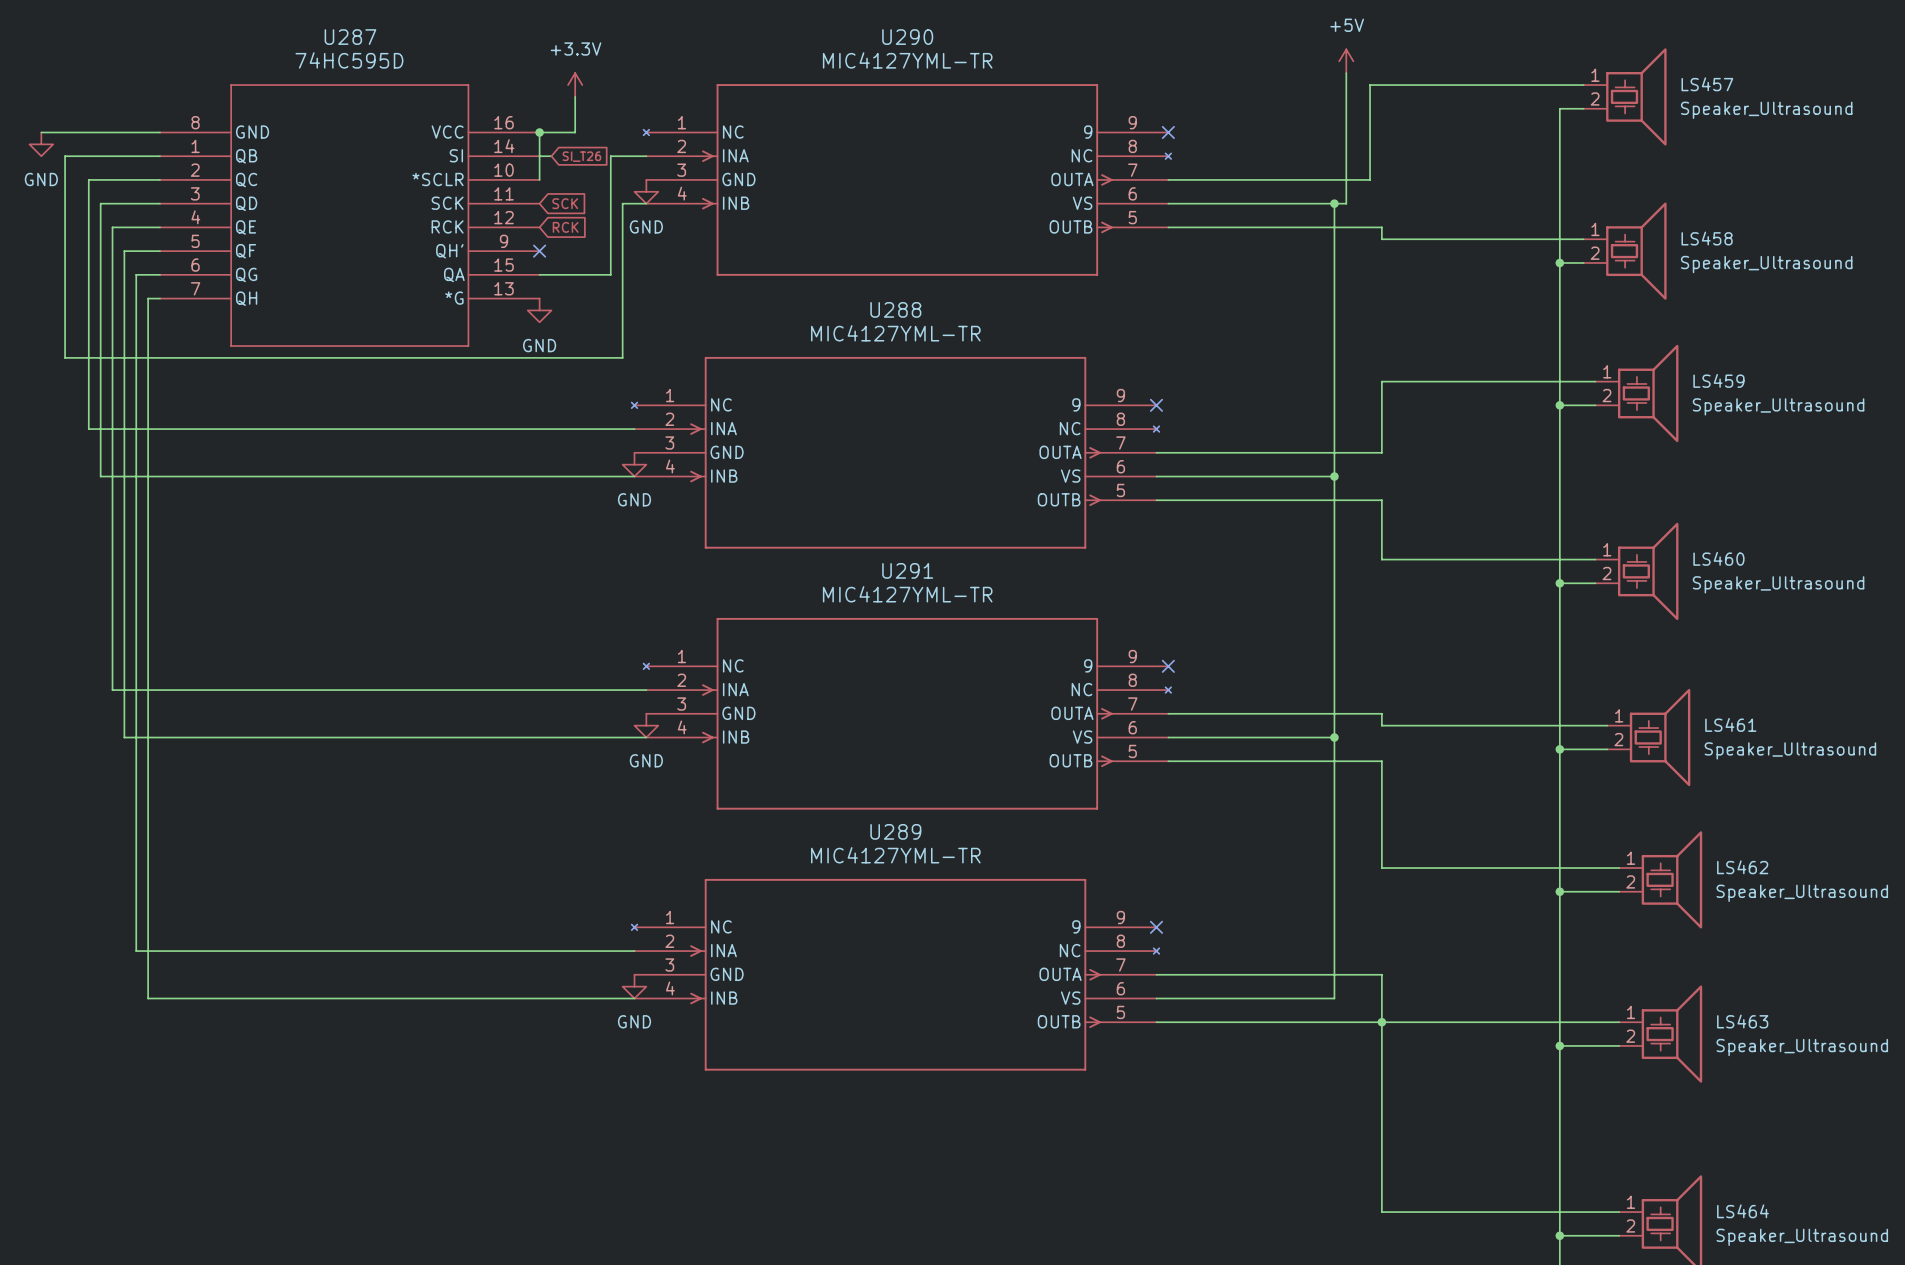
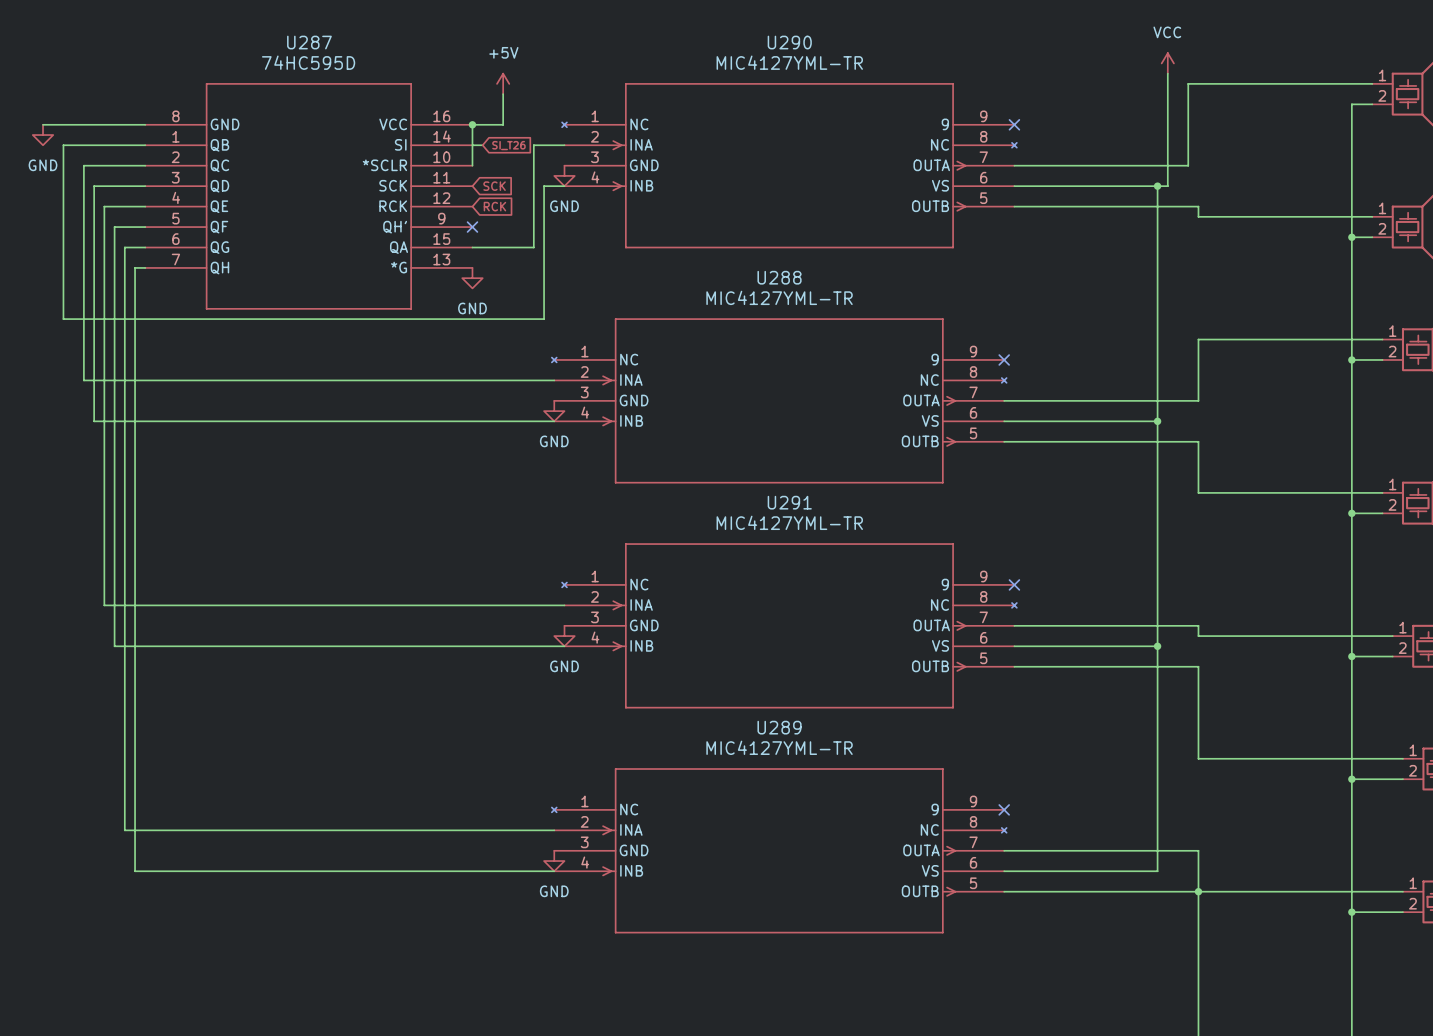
power symbol: +5V (1346, 61) -> VCC (1167, 63)
power symbol: +3.3V (575, 85) -> +5V (503, 83)

